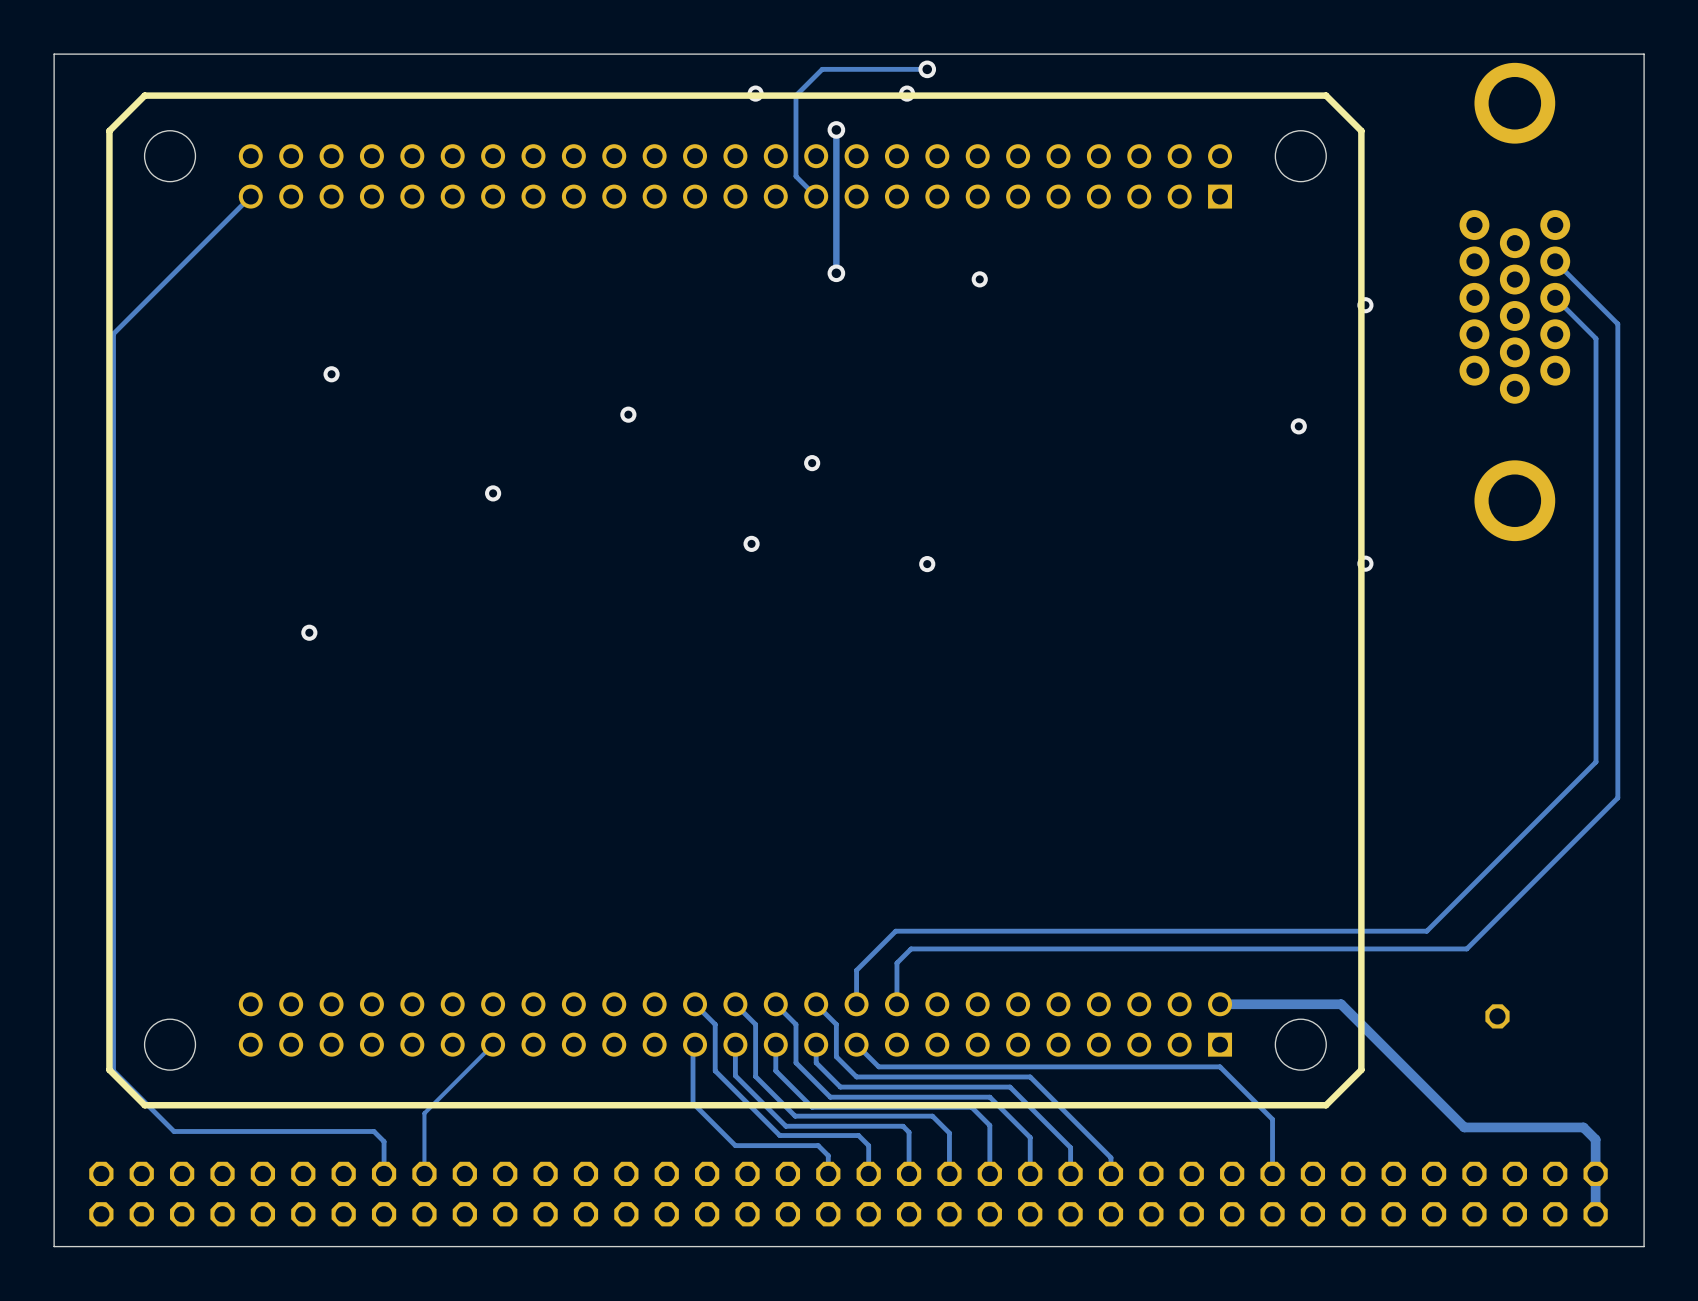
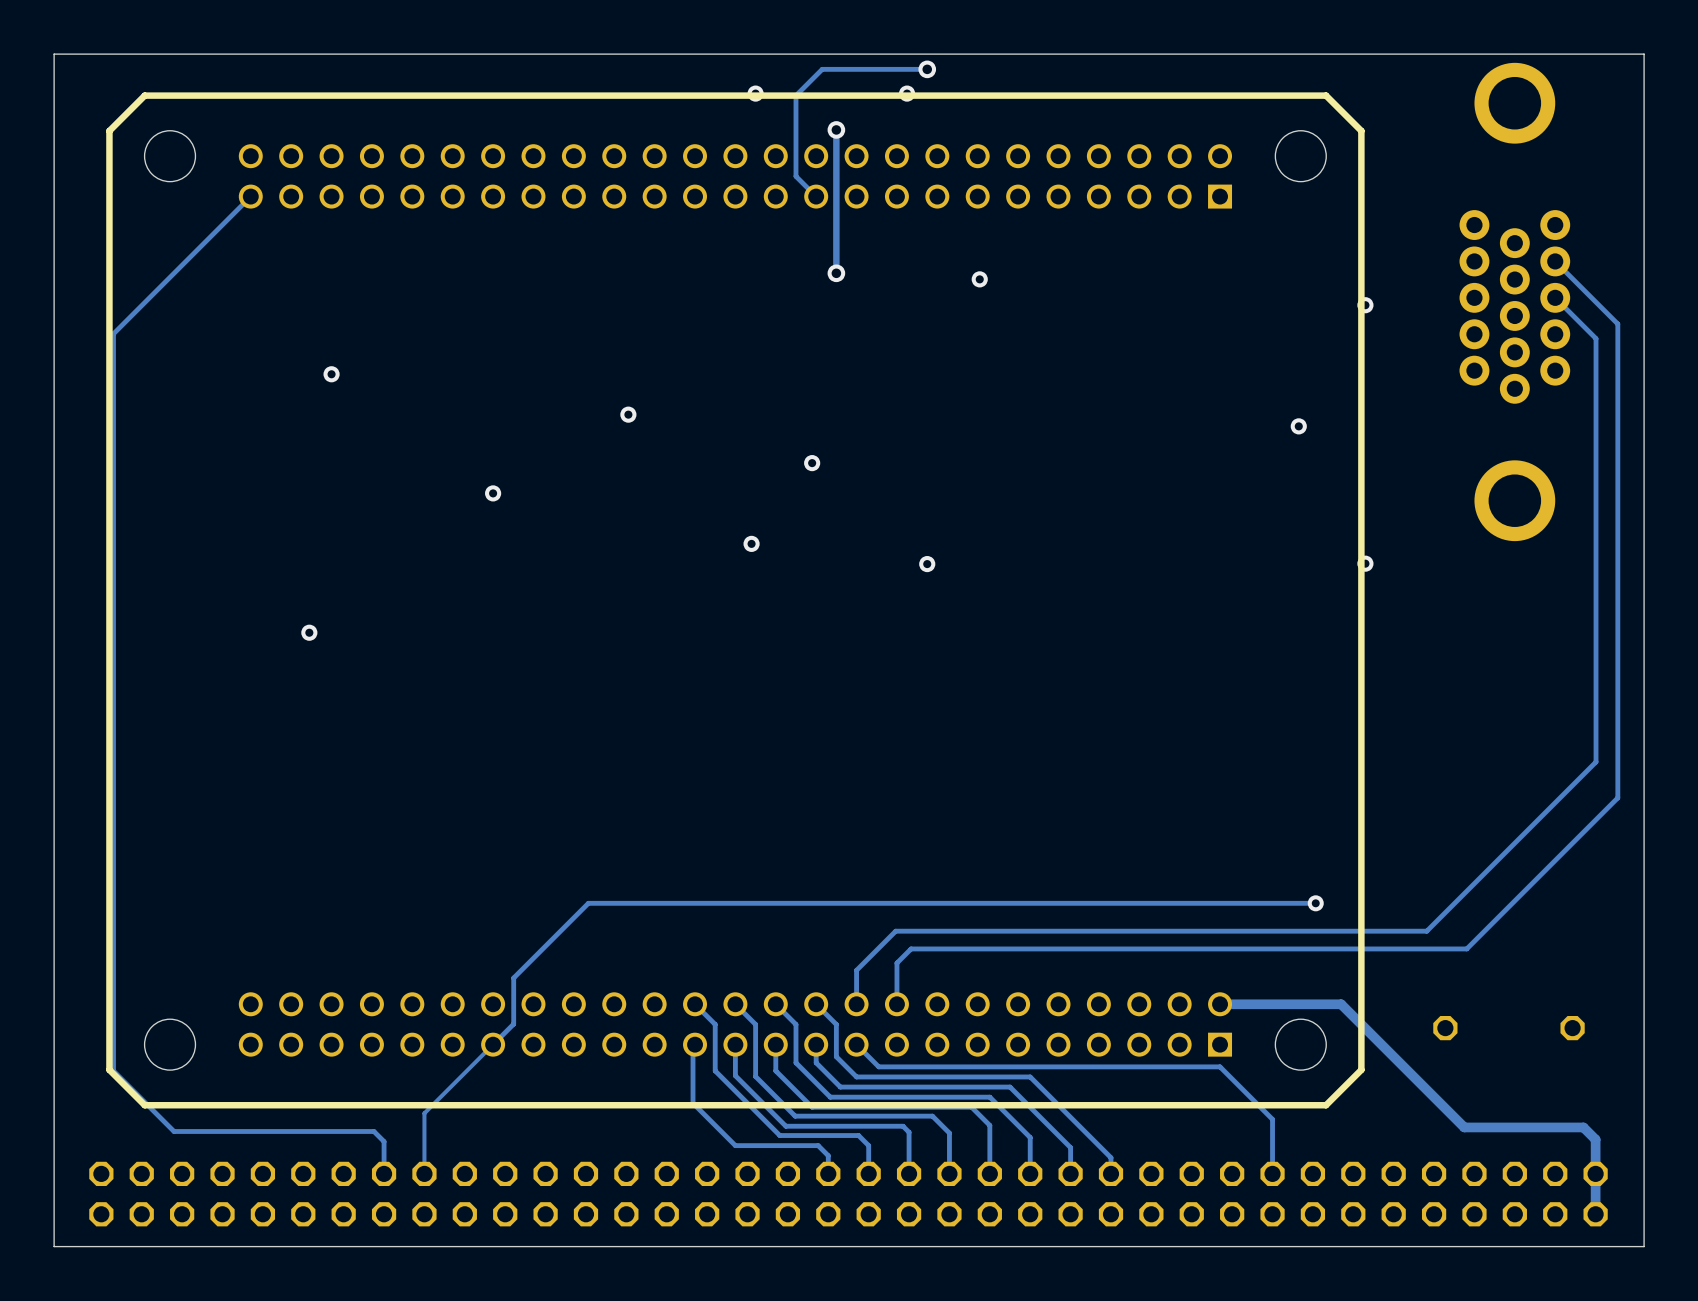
track: none -> (1315, 903) (588, 903) (513, 978) (513, 1024) (493, 1044)
via: none -> (1315, 903)
part: (1497, 1016) -> none
part: none -> (1445, 1028)
part: none -> (1572, 1028)

